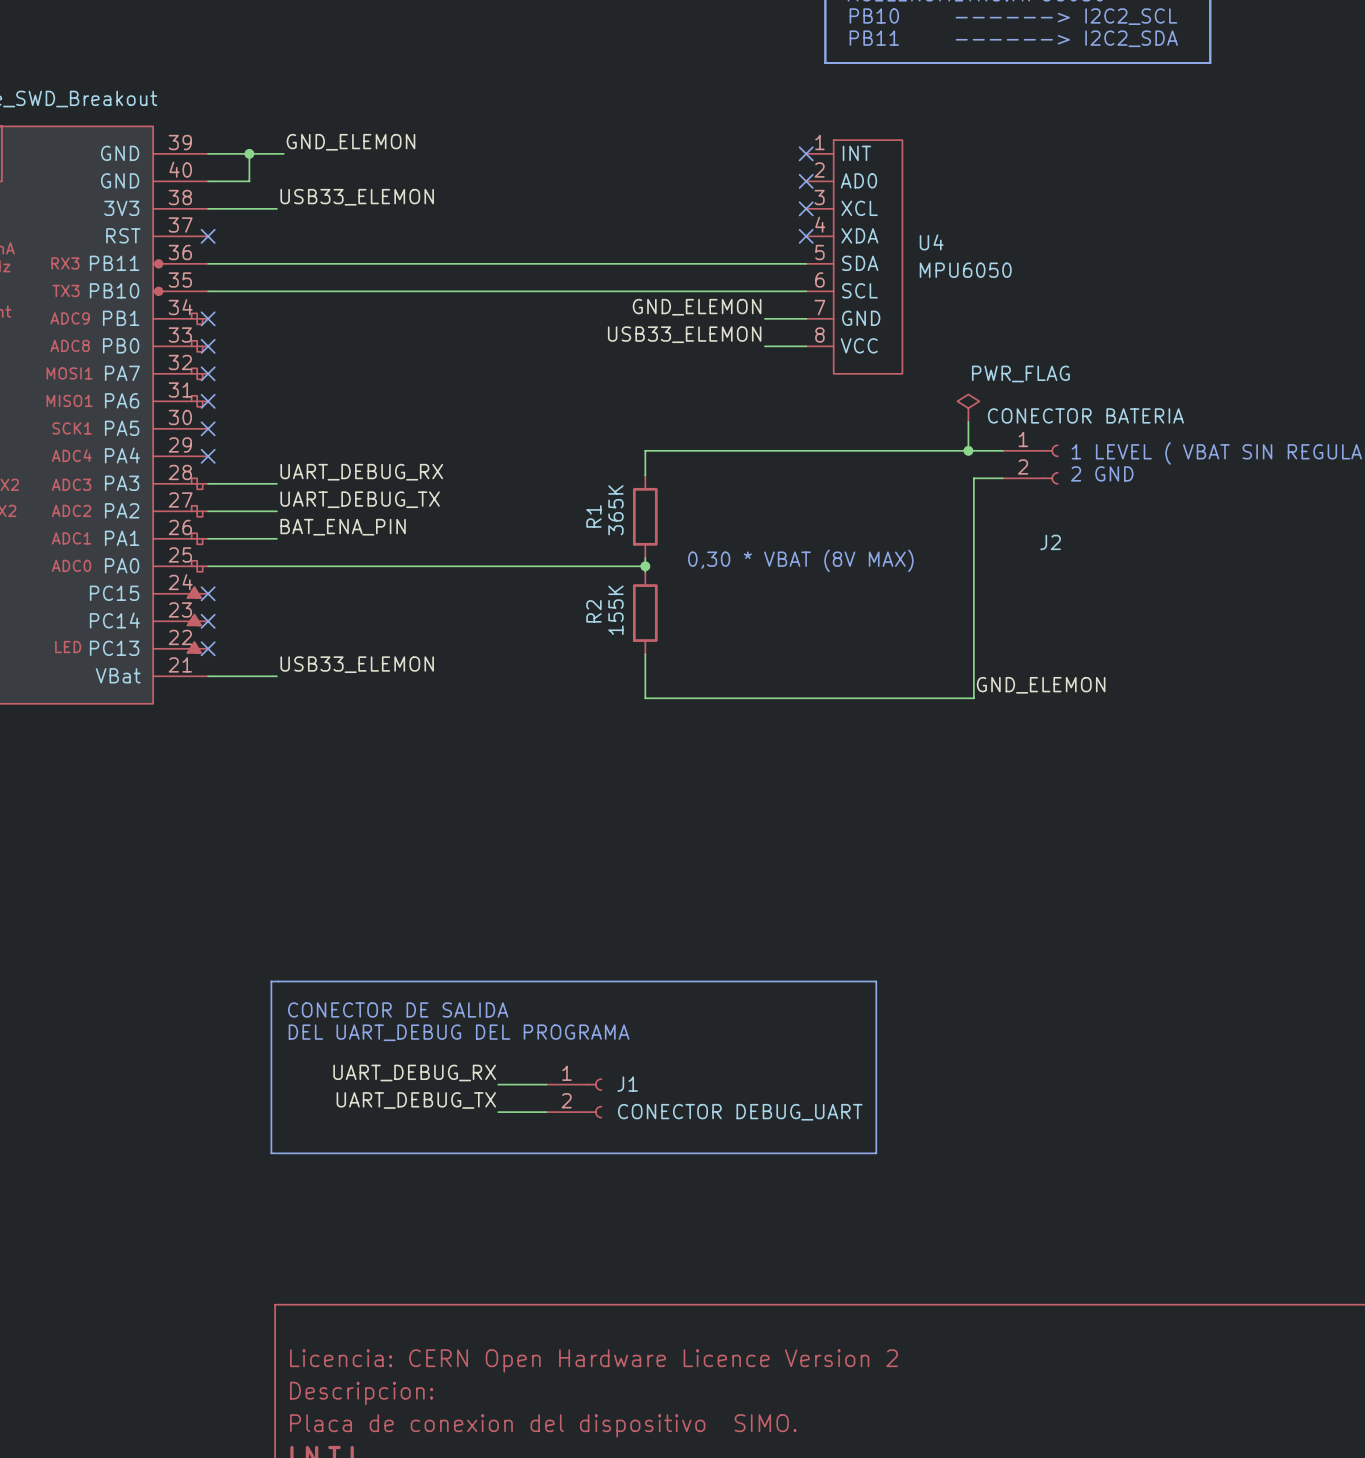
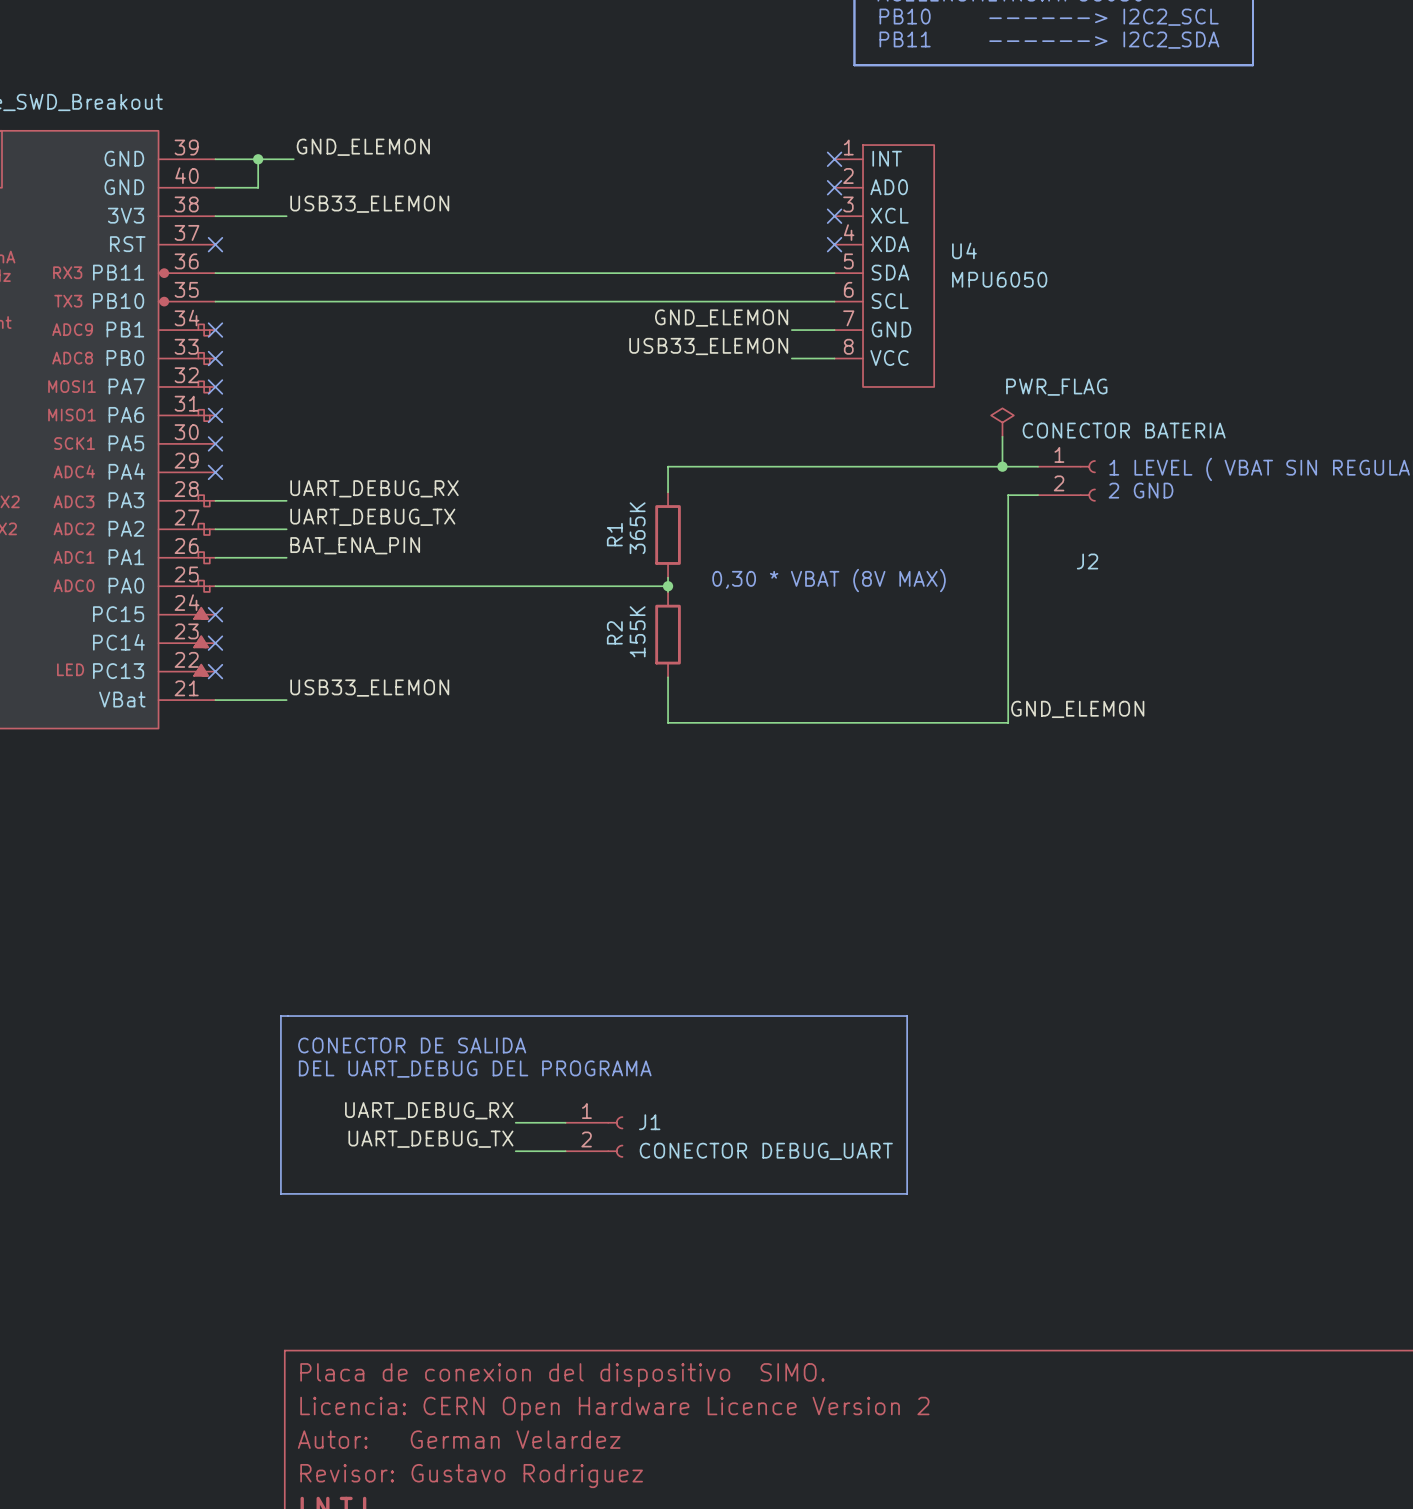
title block: none -> Placa de conexion del dispositivo SIMO. (562, 1375)
title block: Descripcion: (361, 1393) -> Autor: German Velardez (459, 1439)
title block: Placa de conexion del dispositivo SIMO. (543, 1425) -> Revisor: Gustavo Rodriguez (471, 1476)

